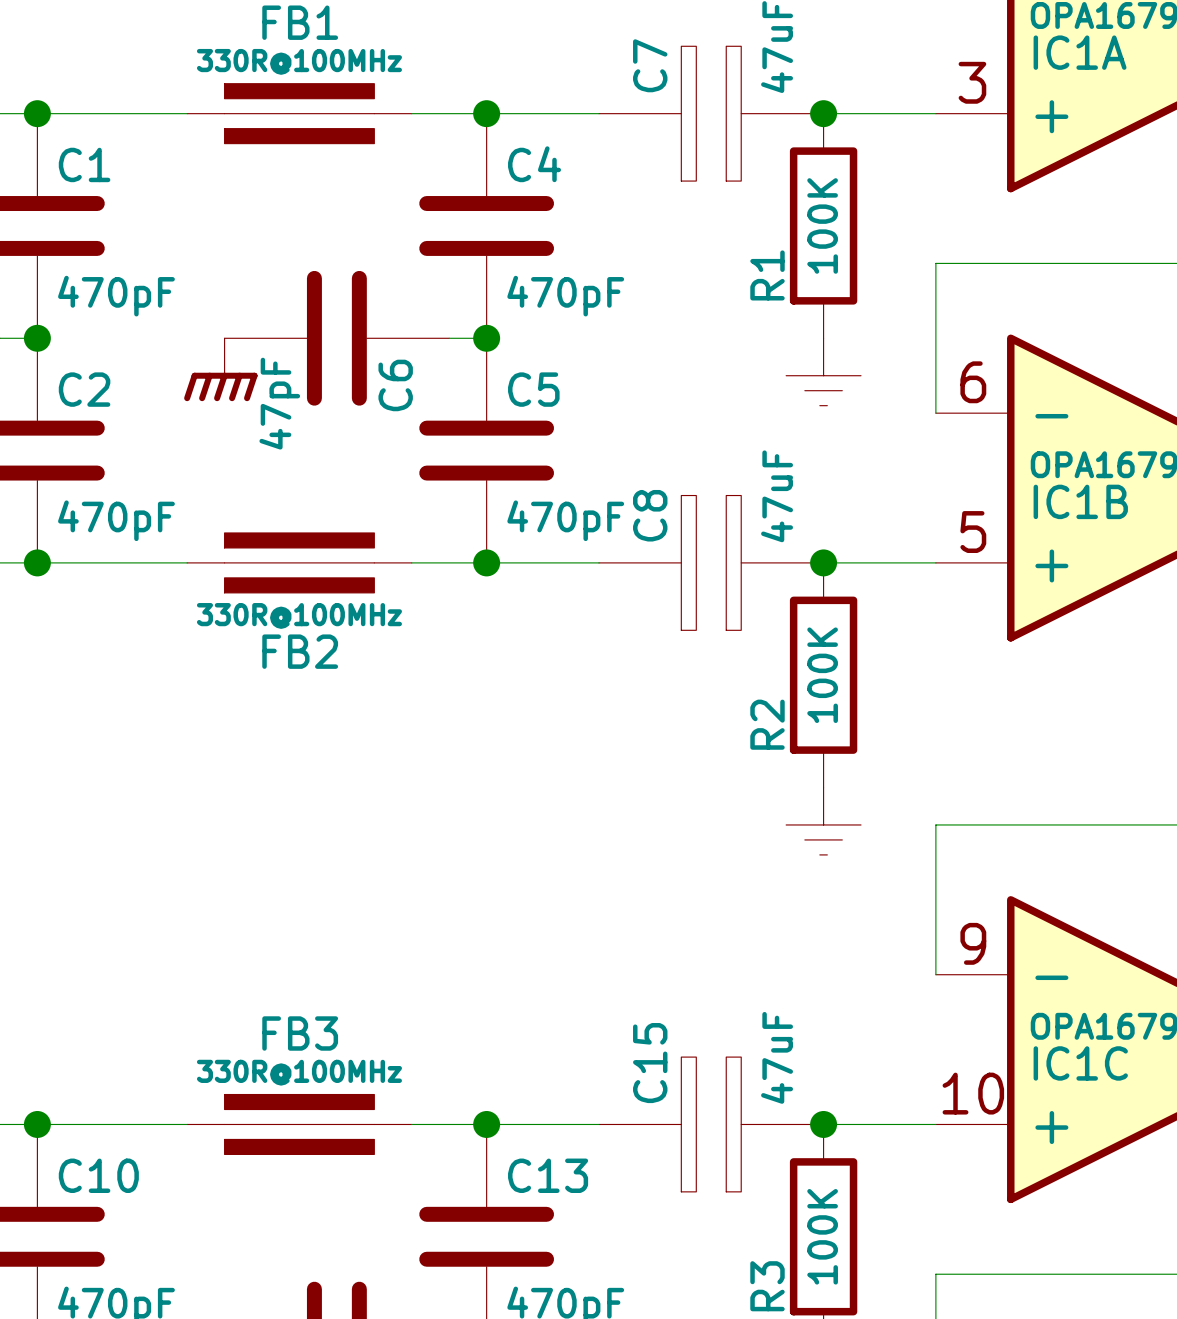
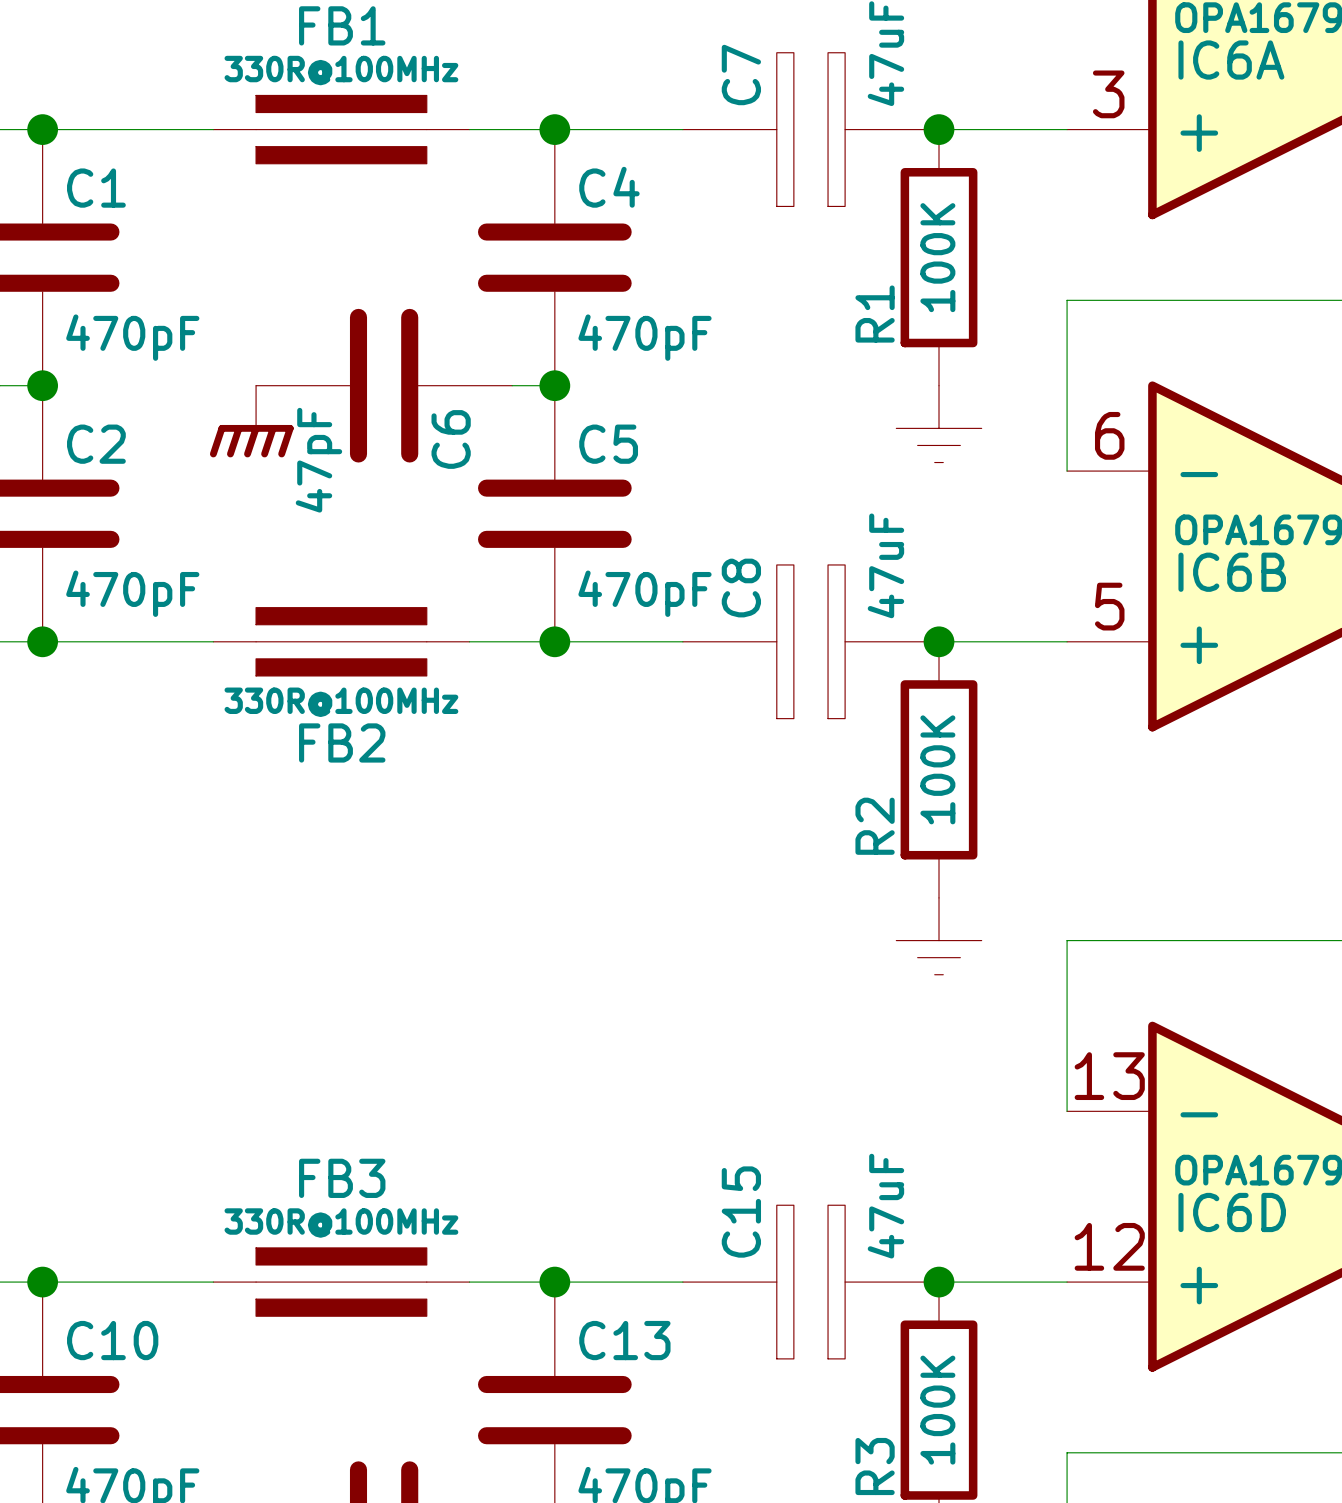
IC1A name: IC1A (1080, 52) -> IC6A (1231, 60)
IC1B name: IC1B (1080, 501) -> IC6B (1232, 572)
IC1C pin number: 9 (973, 943) -> 13 (1109, 1076)
IC1C name: IC1C (1080, 1063) -> IC6D (1232, 1212)
IC1C pin number: 10 (973, 1093) -> 12 (1109, 1246)

